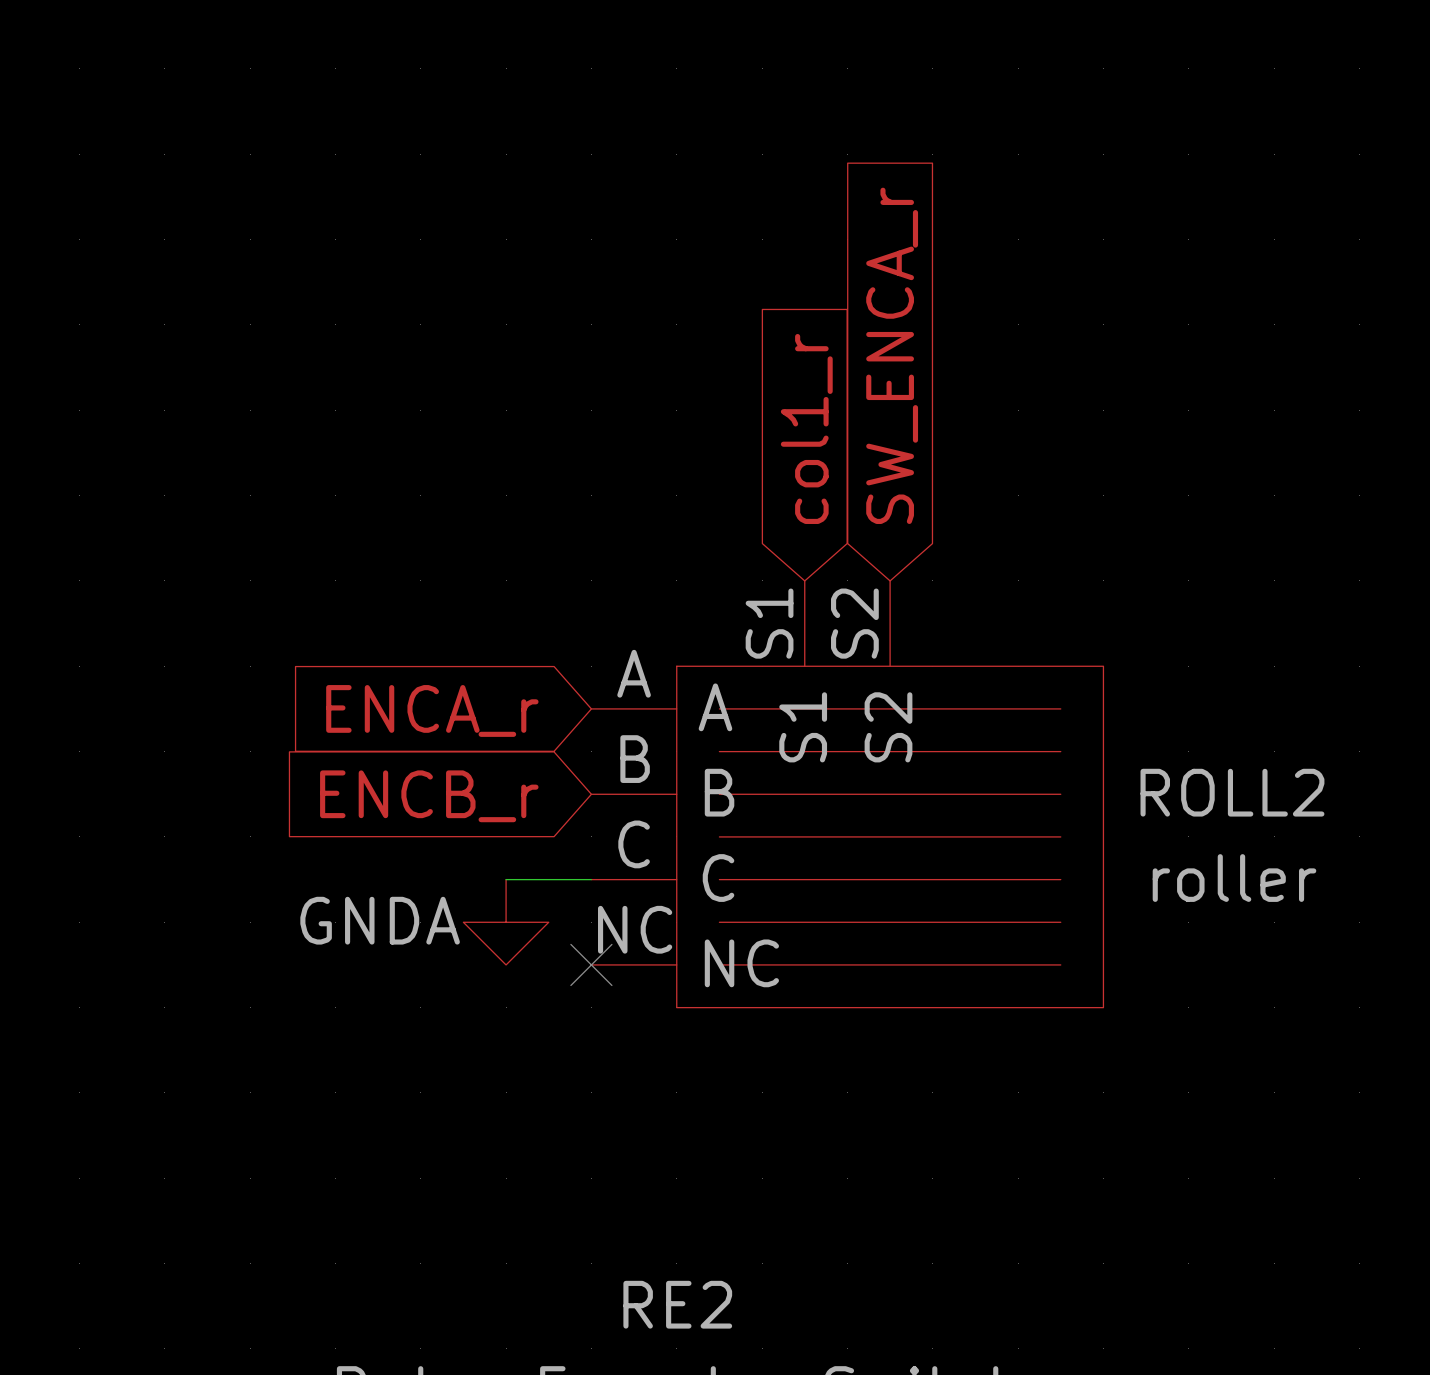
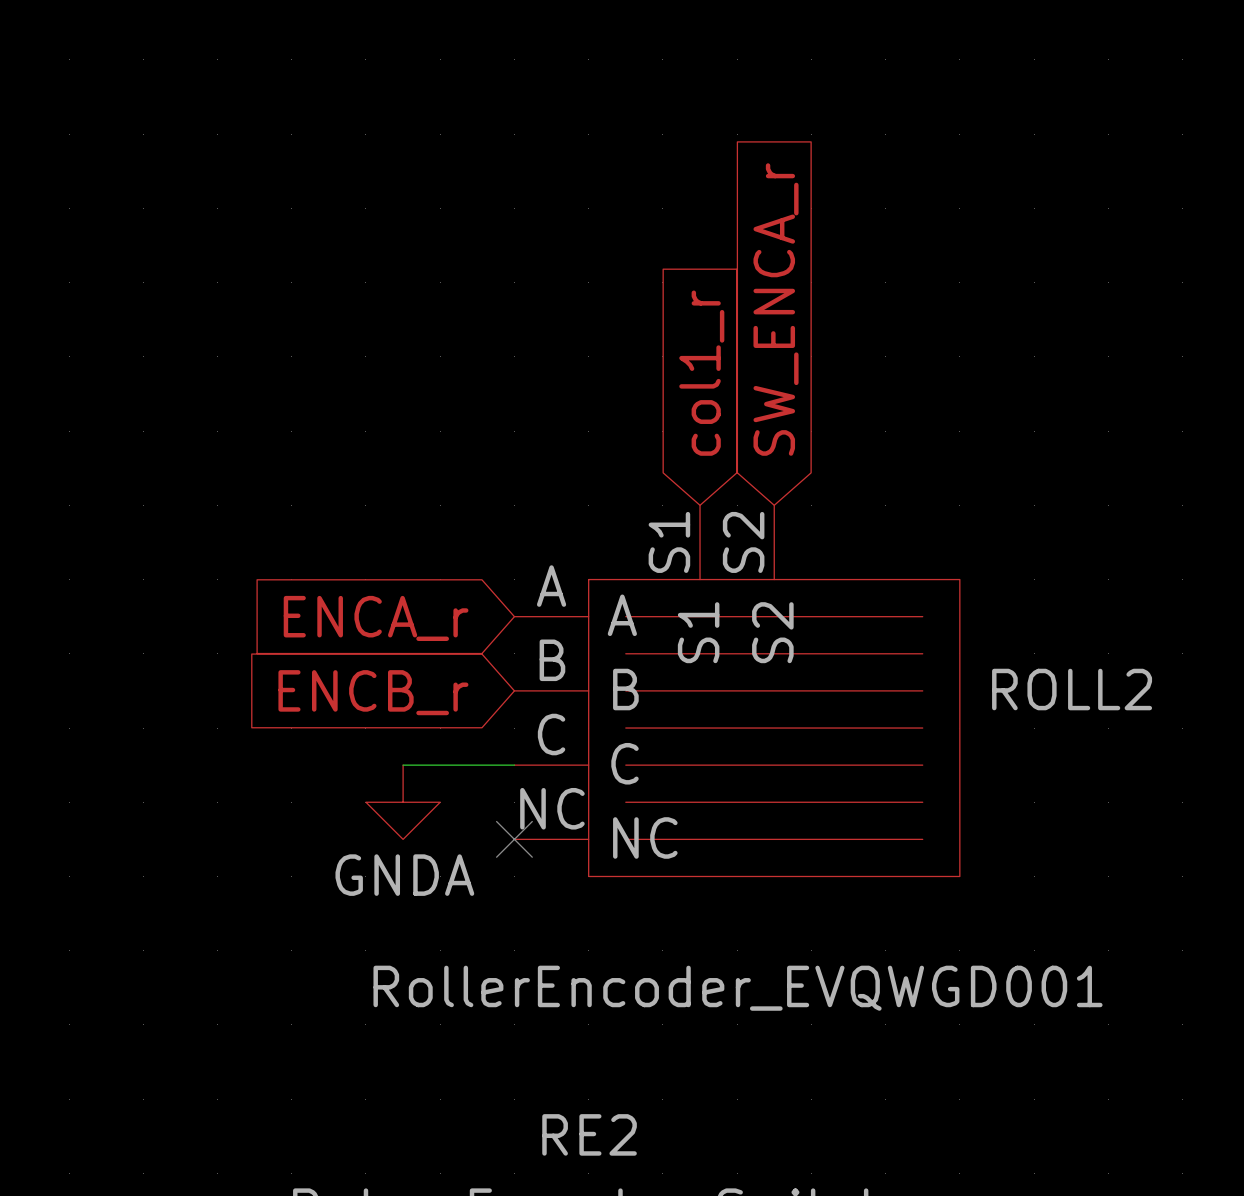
ROLL2 value: roller (1234, 878) -> RollerEncoder_EVQWGD001 (738, 988)
wire: none -> (403, 765) (440, 765)
power symbol text position: GNDA (380, 920) -> GNDA (404, 875)
power symbol position: GNDA (506, 922) -> GNDA (403, 802)

